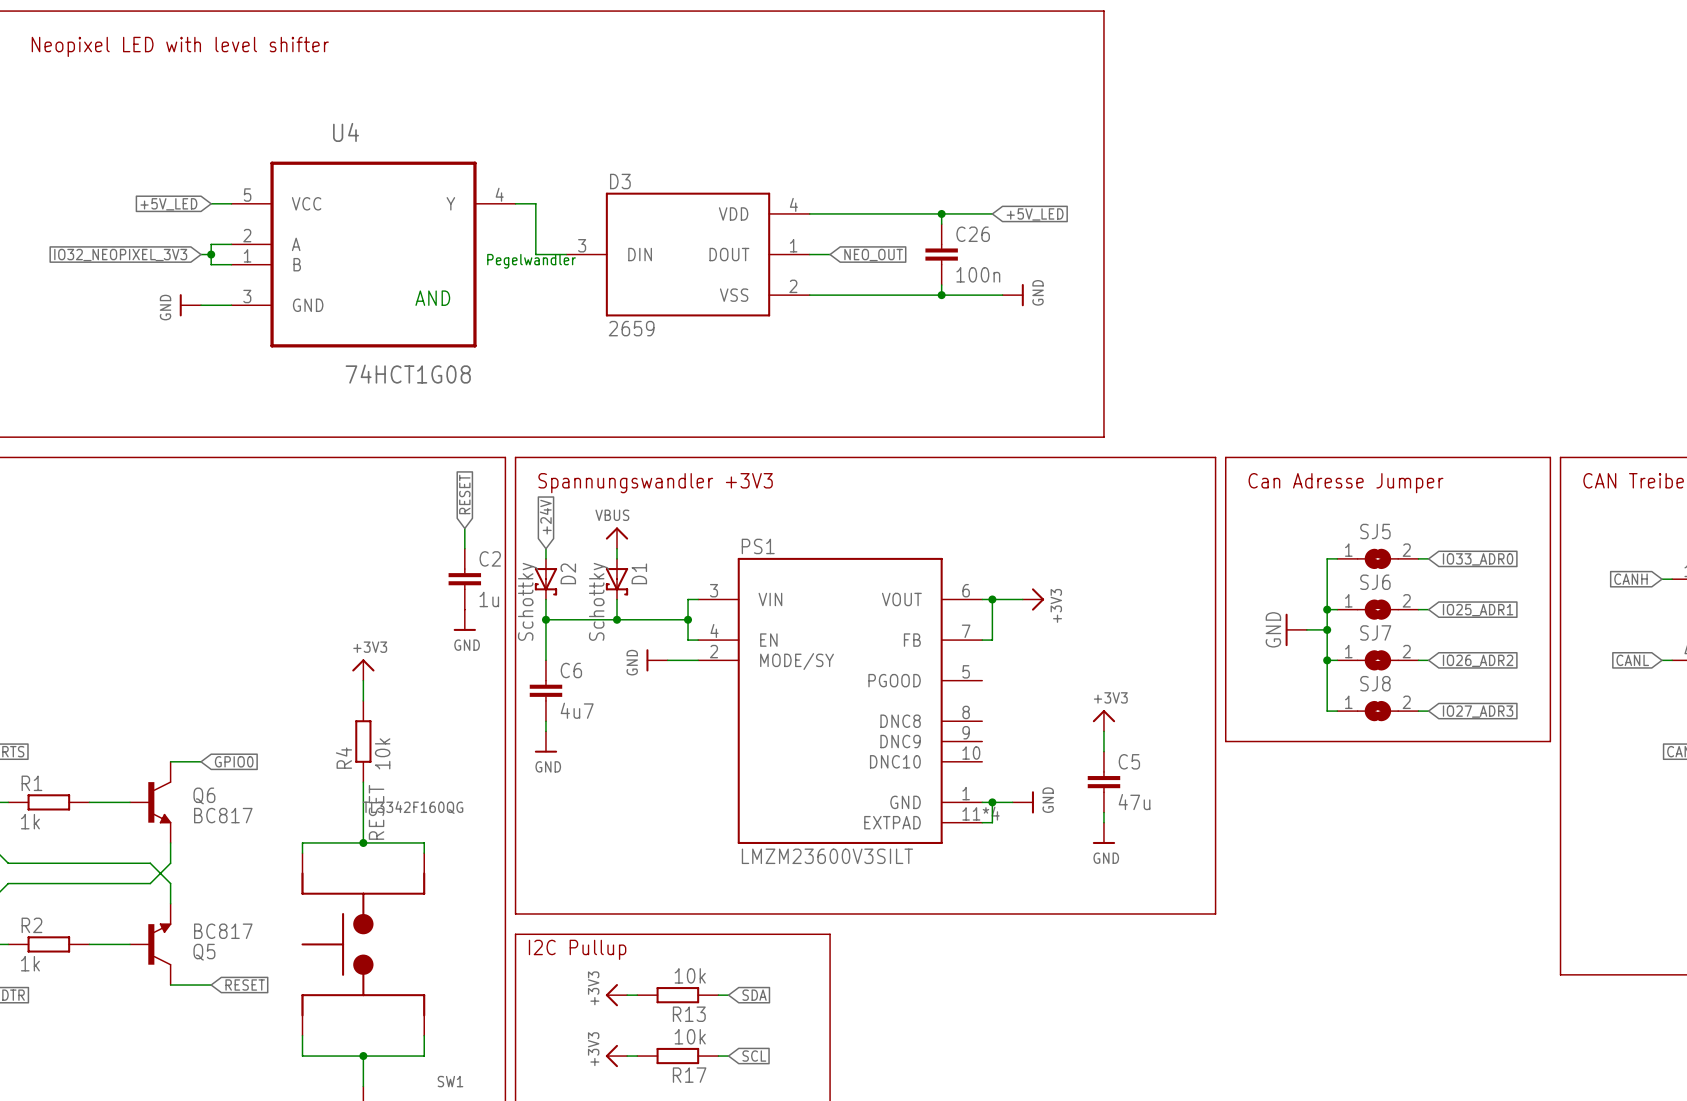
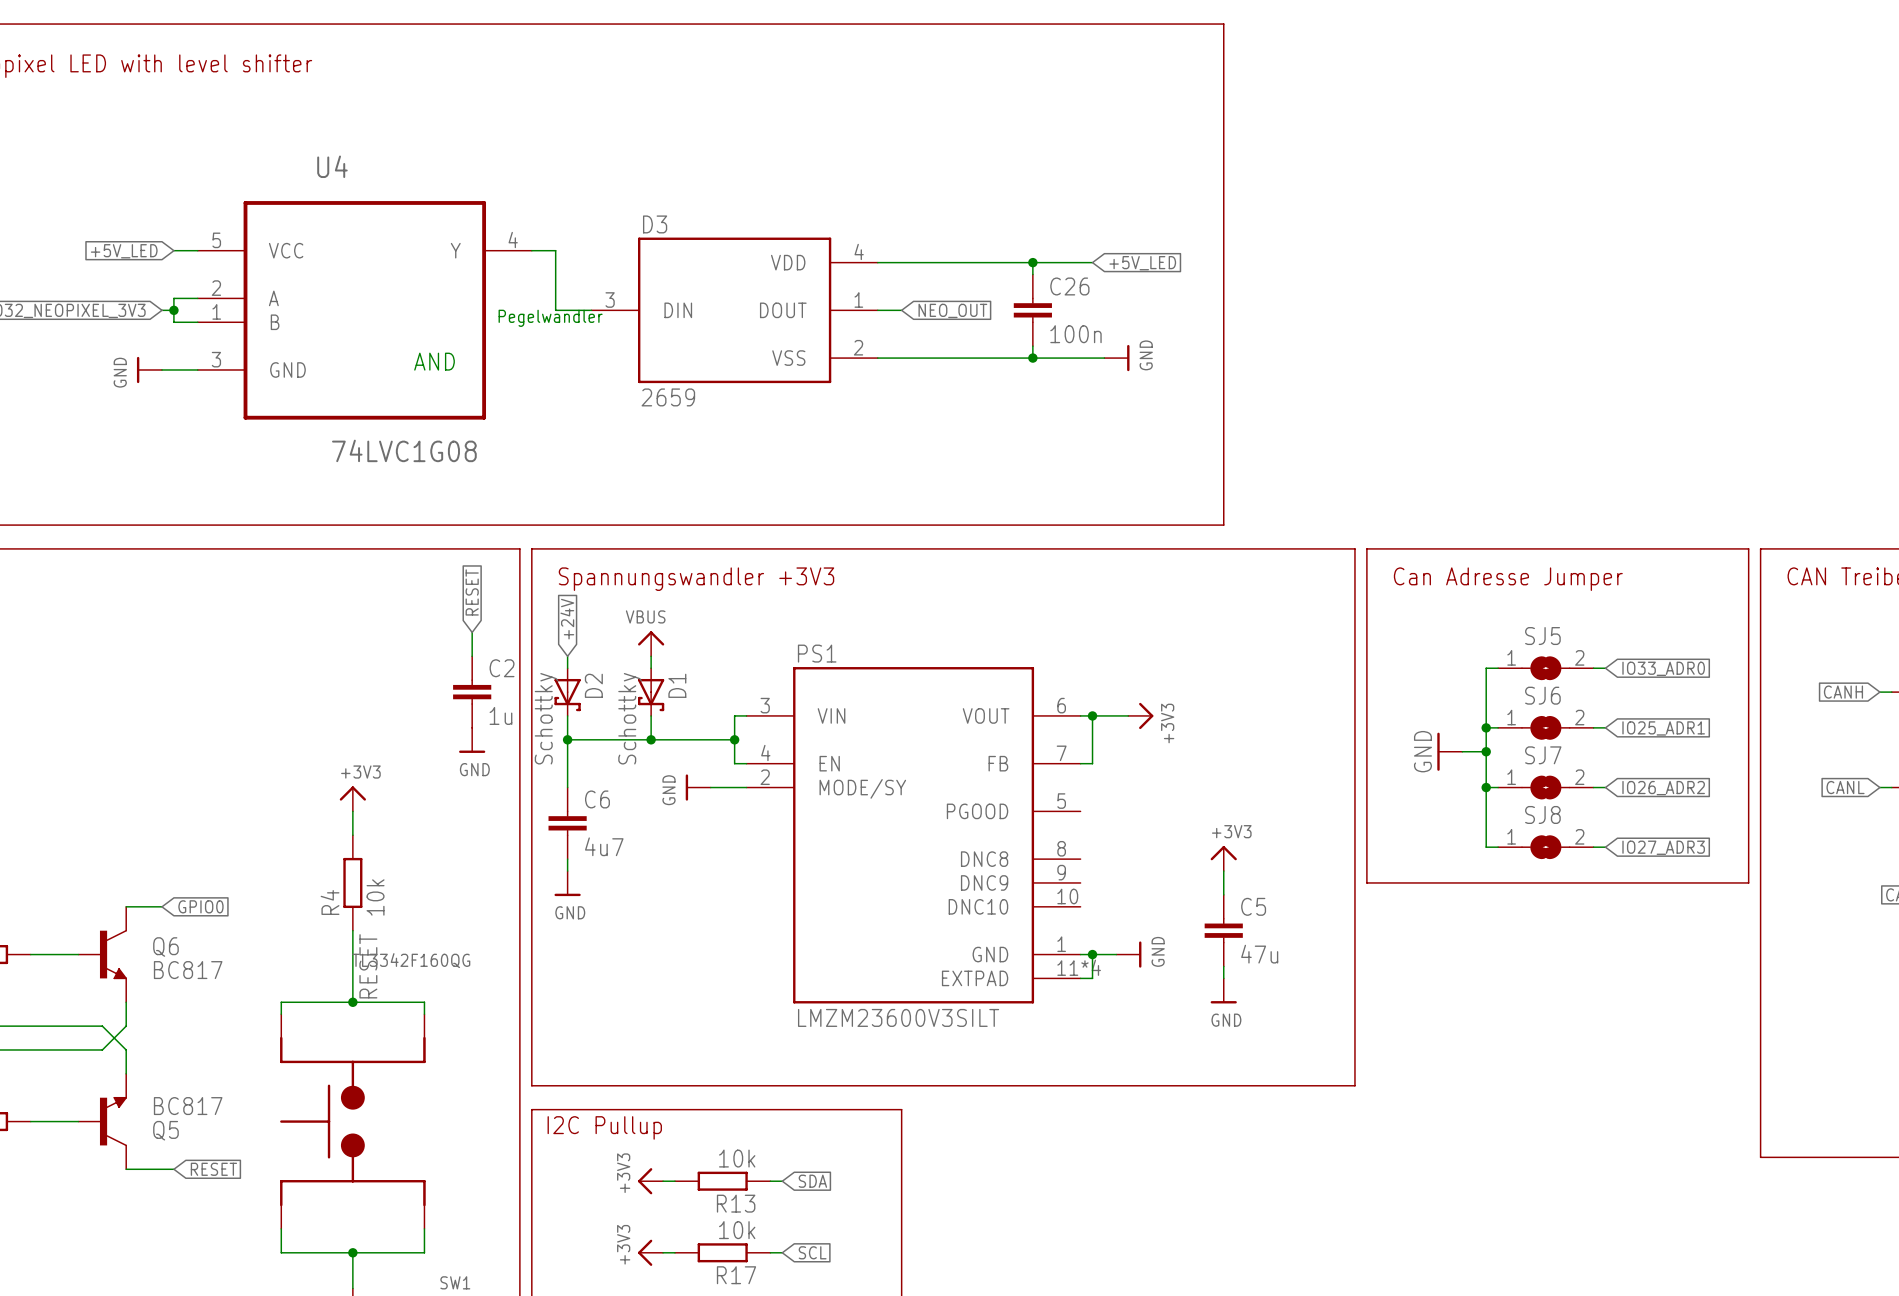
U4 value: 74HCT1G08 (408, 374) -> 74LVC1G08 (404, 450)

